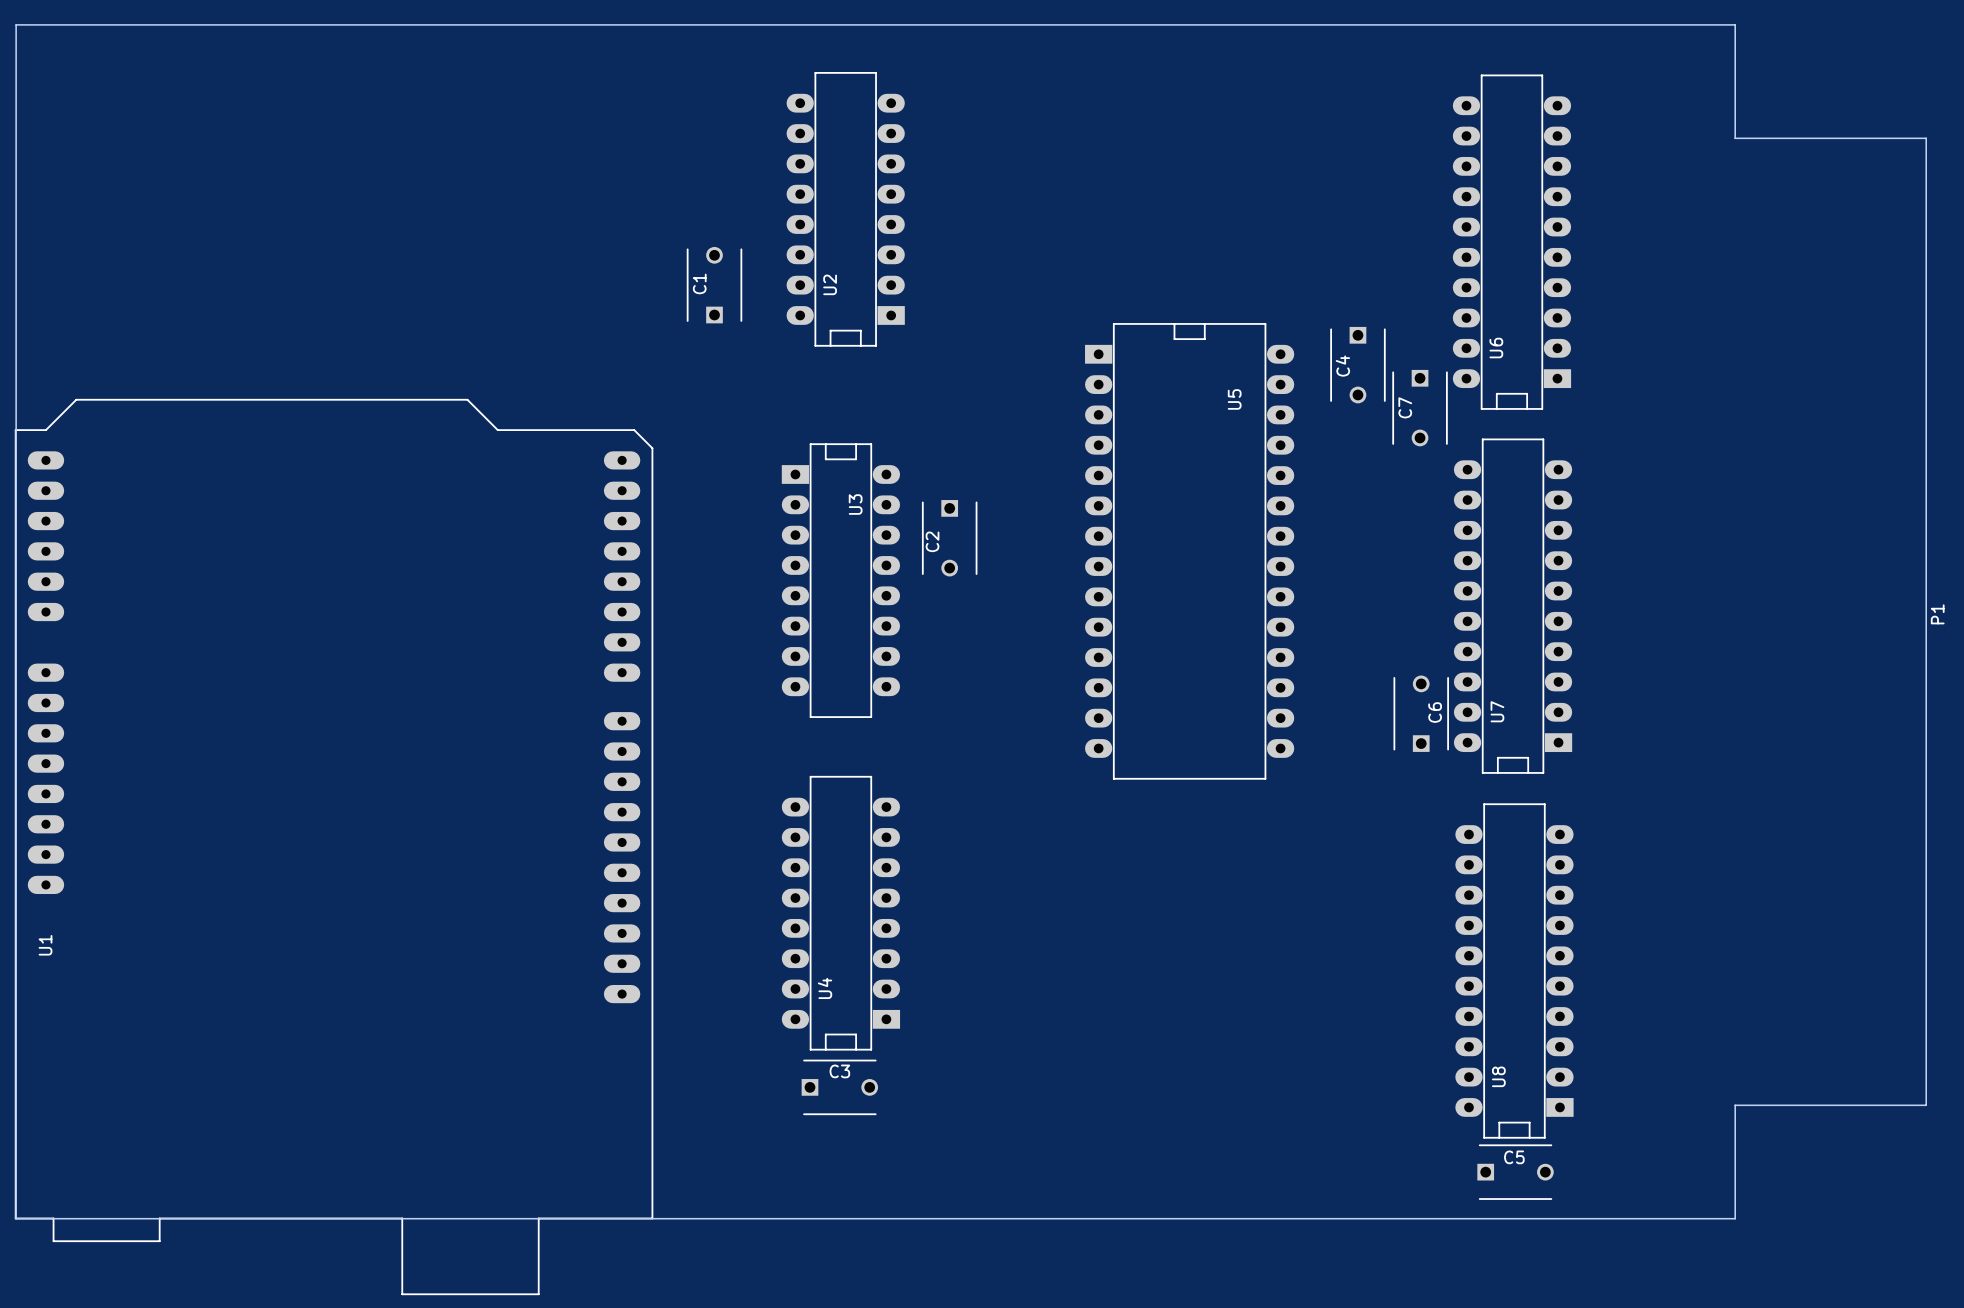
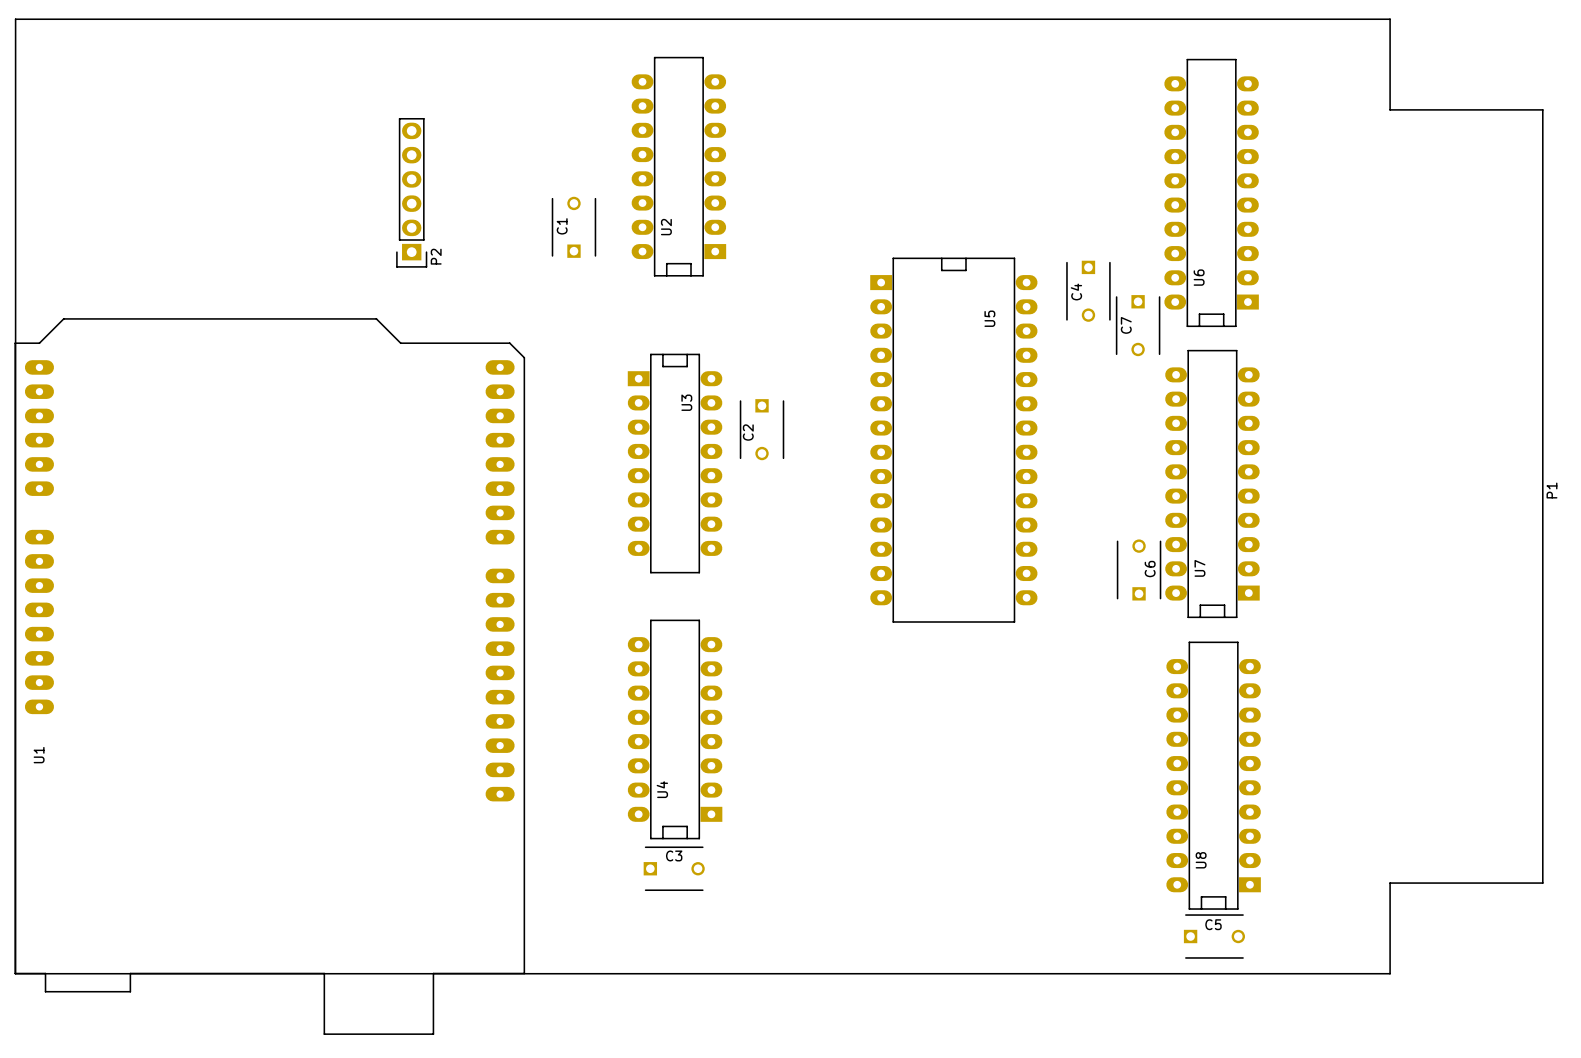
P2: none -> (411, 192)

